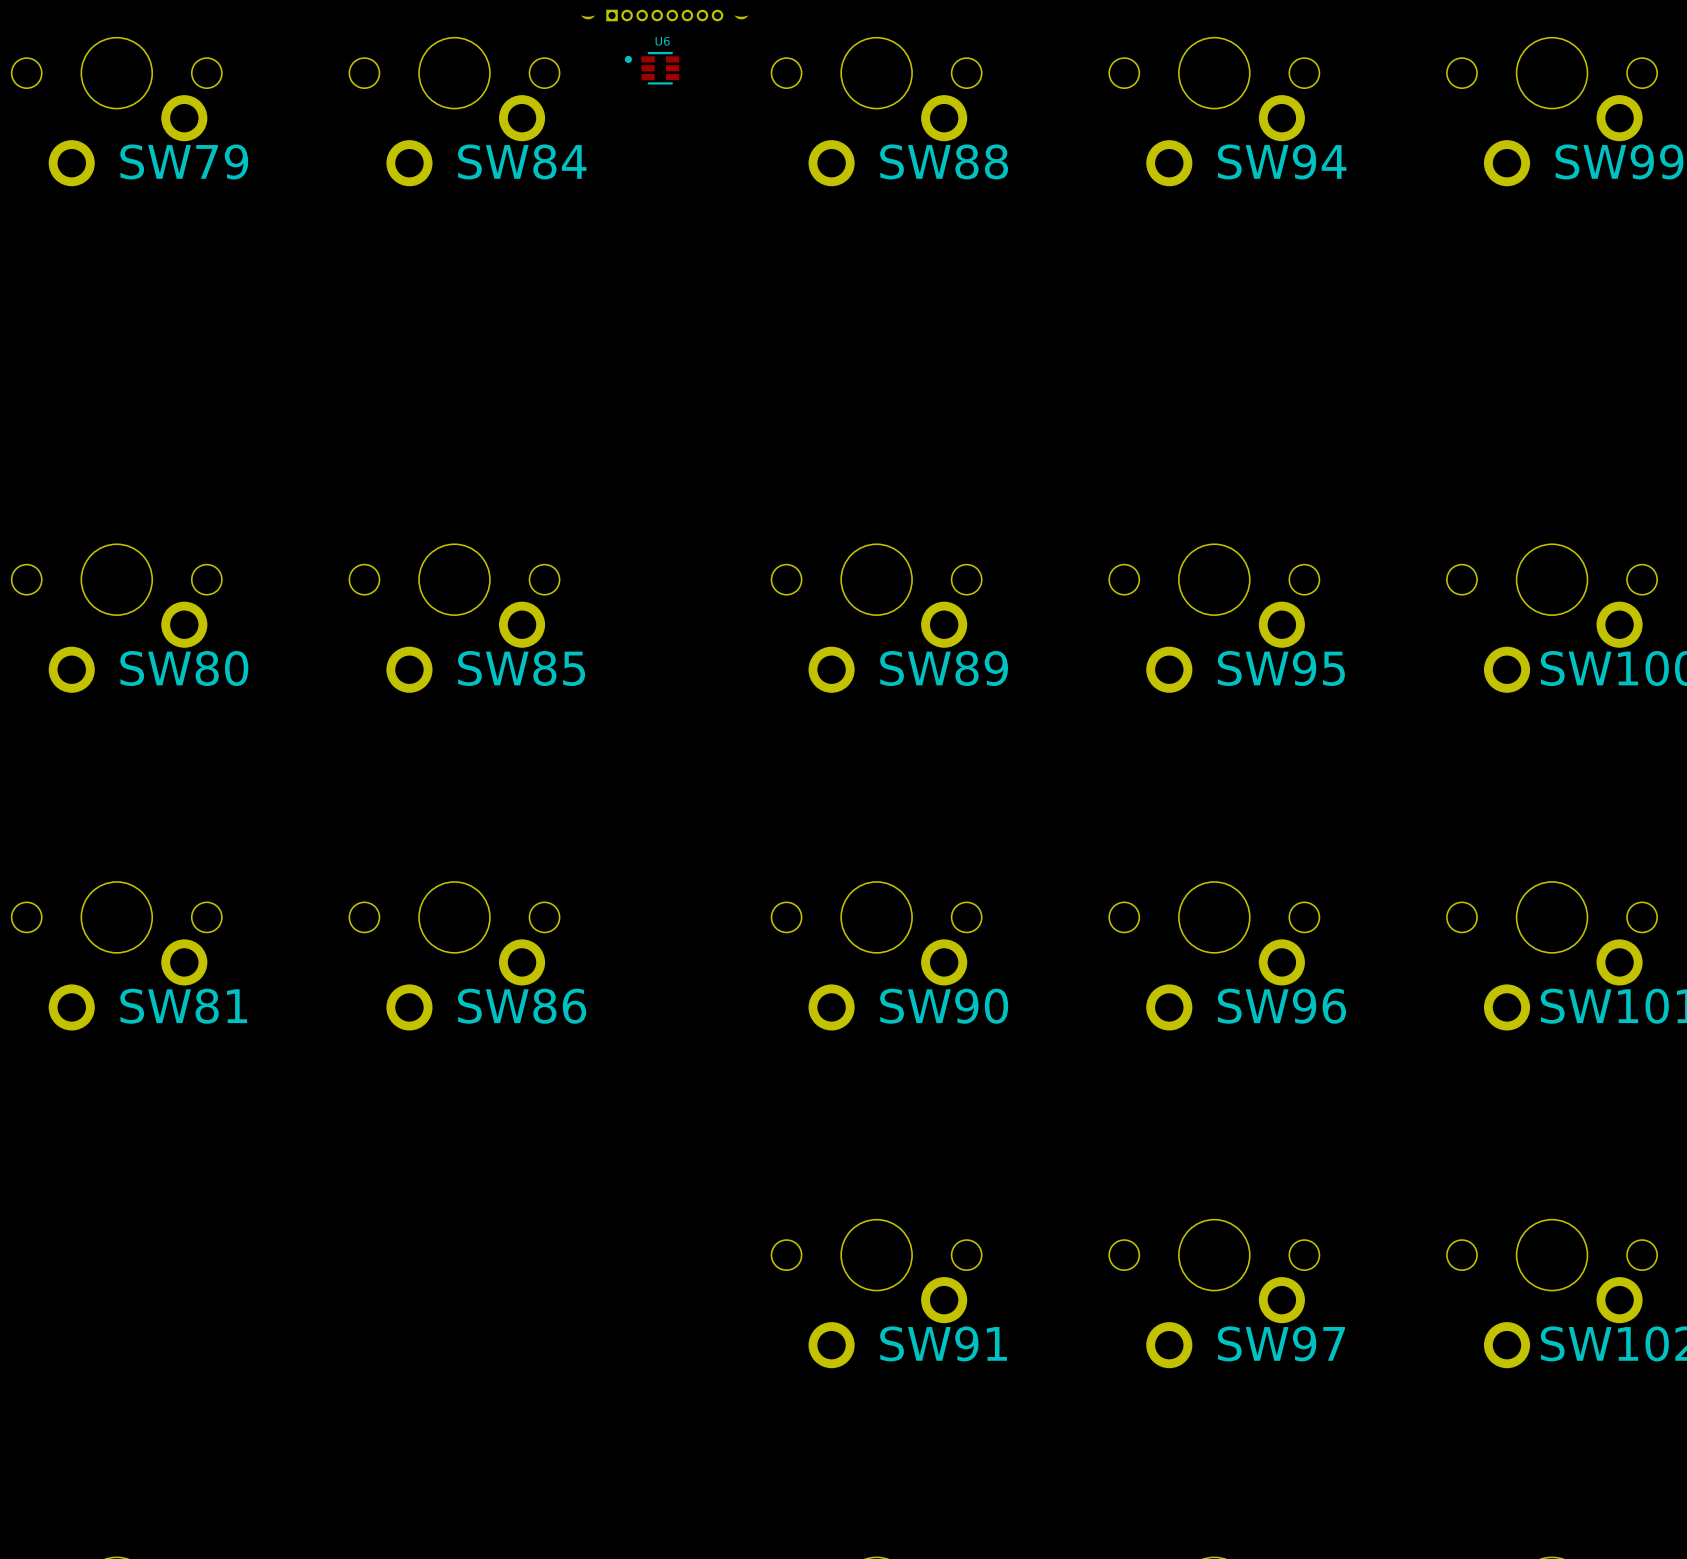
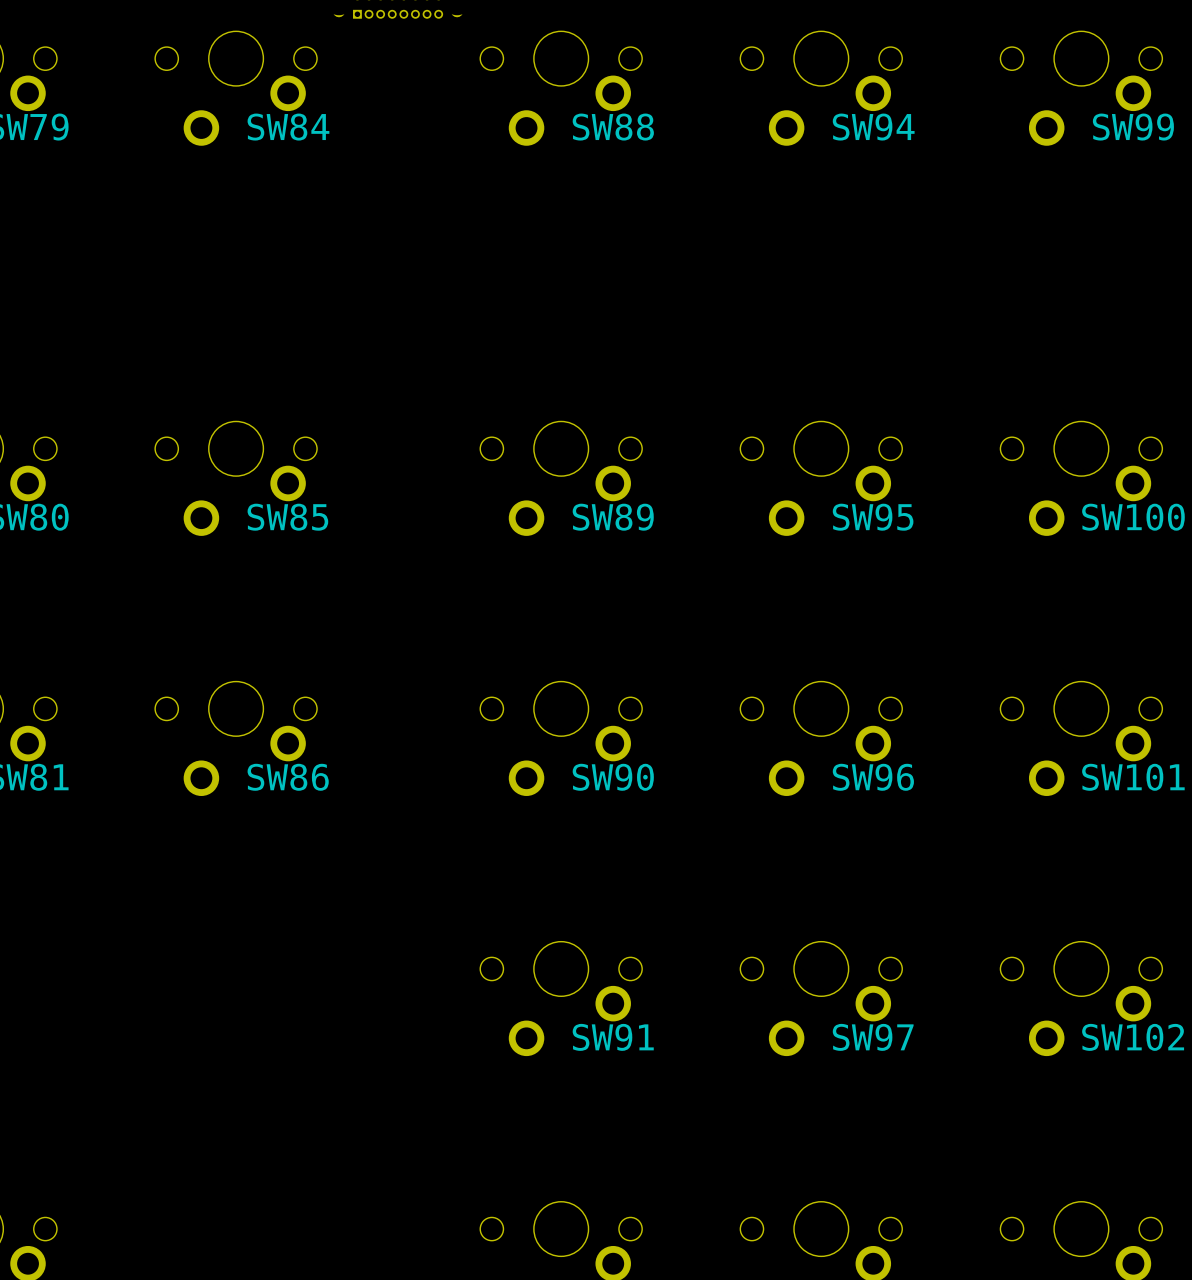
U6: (652, 68) -> none

